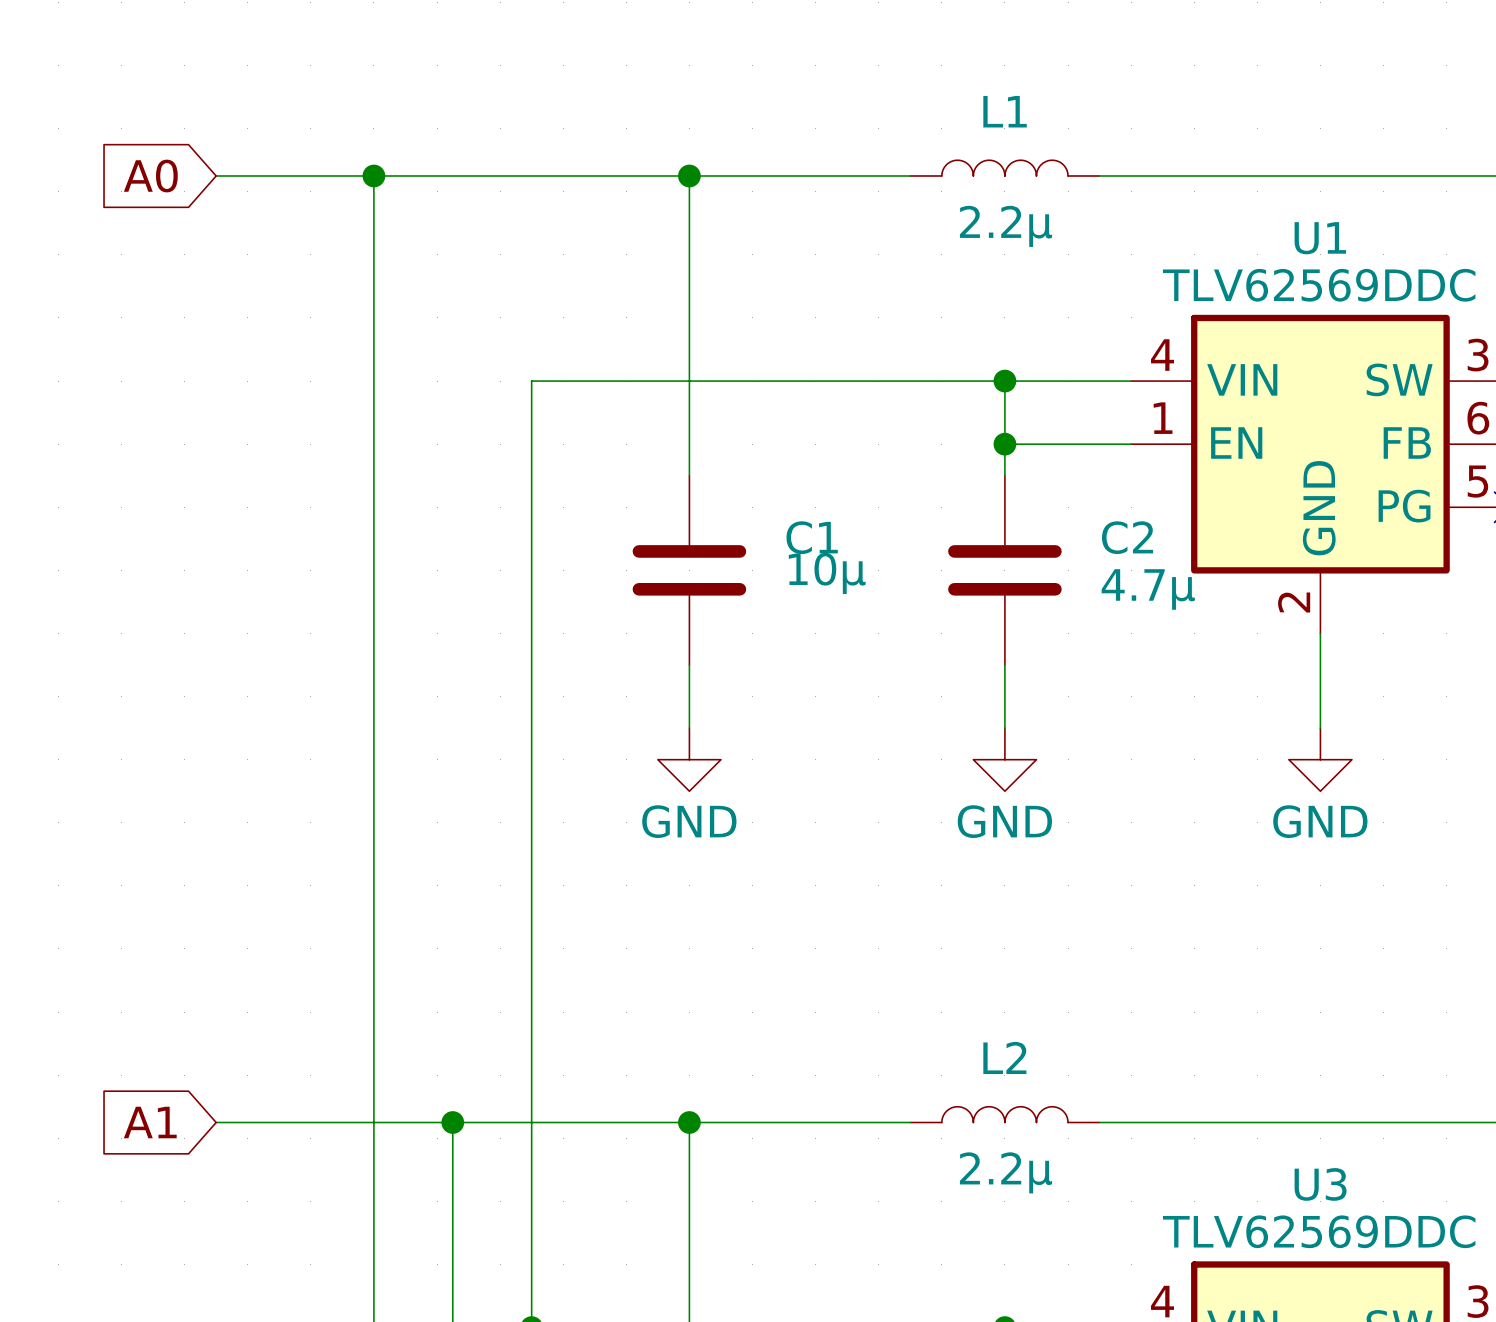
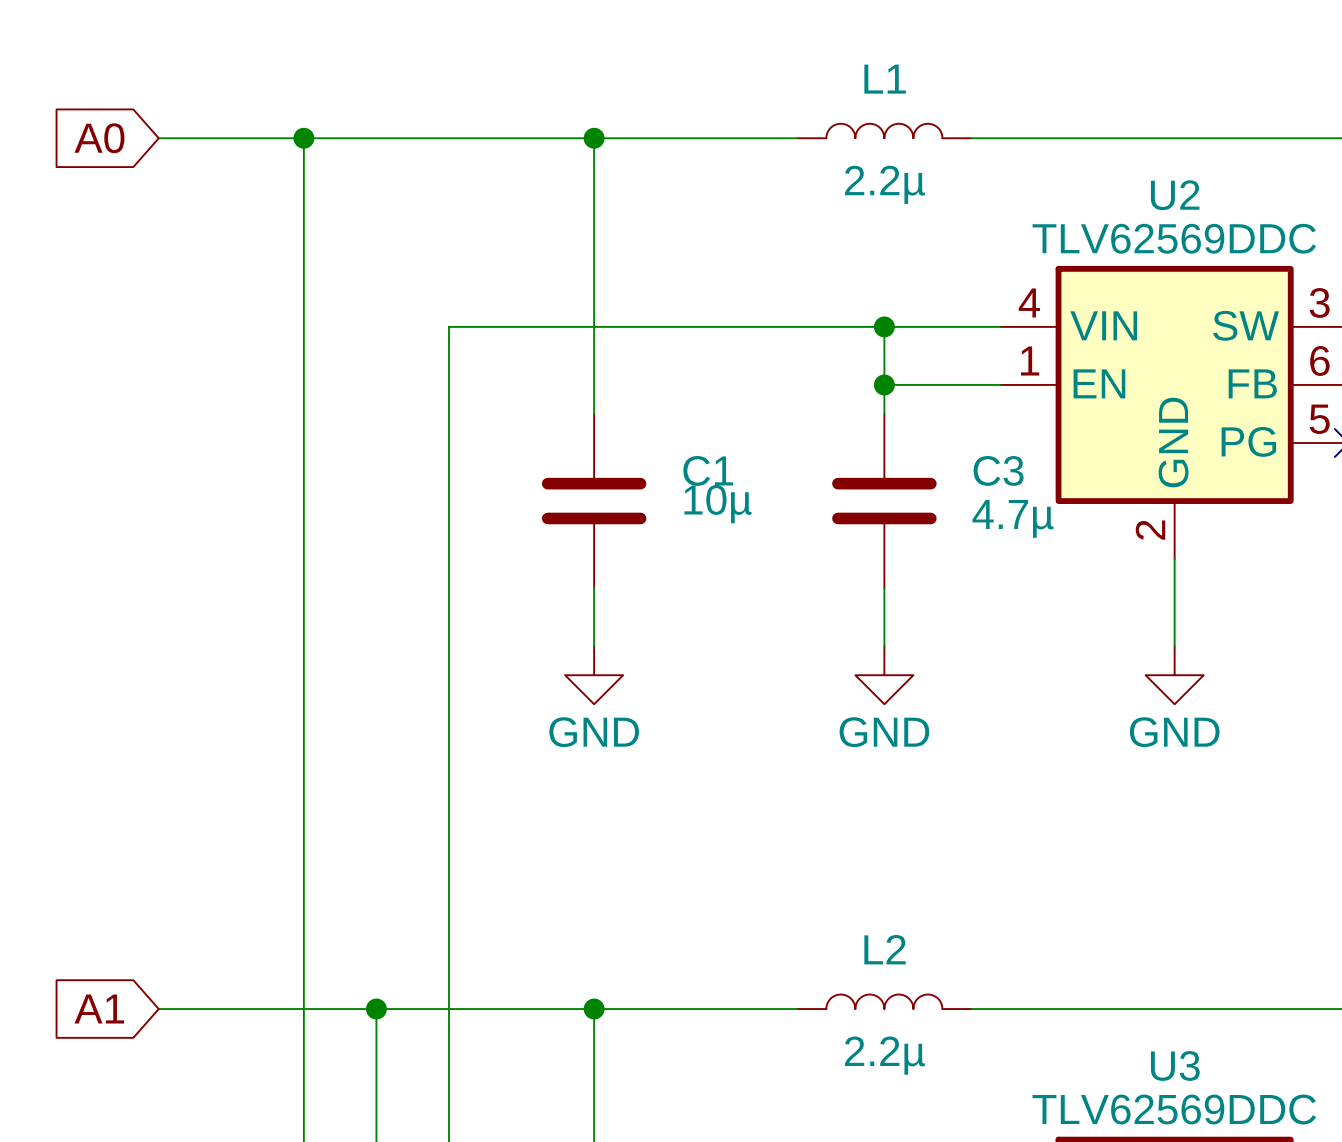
U1 name: U1 (1320, 238) -> U2 (1175, 195)
C2 name: C2 (1127, 537) -> C3 (998, 470)

